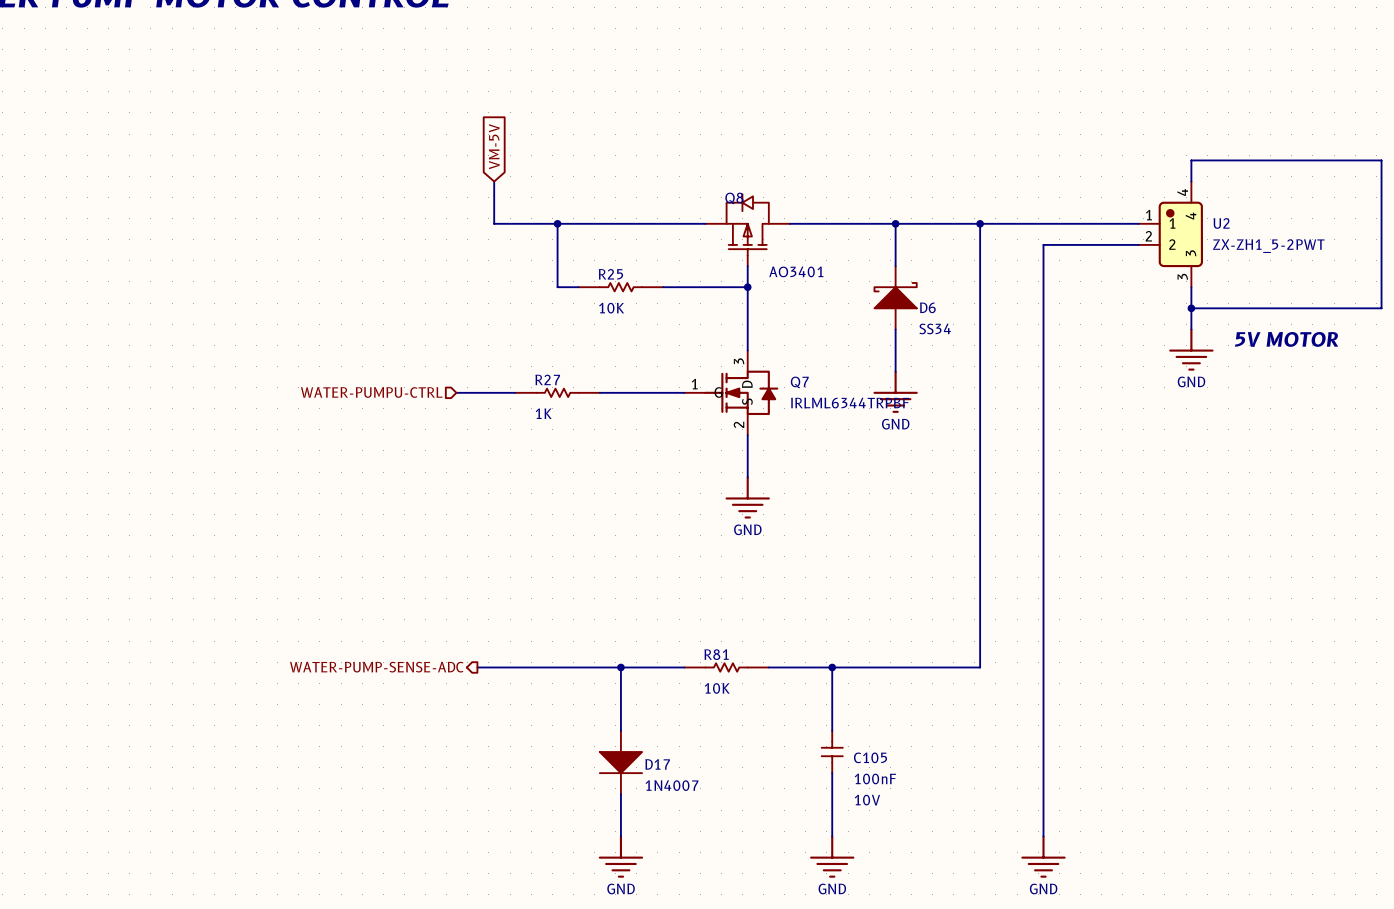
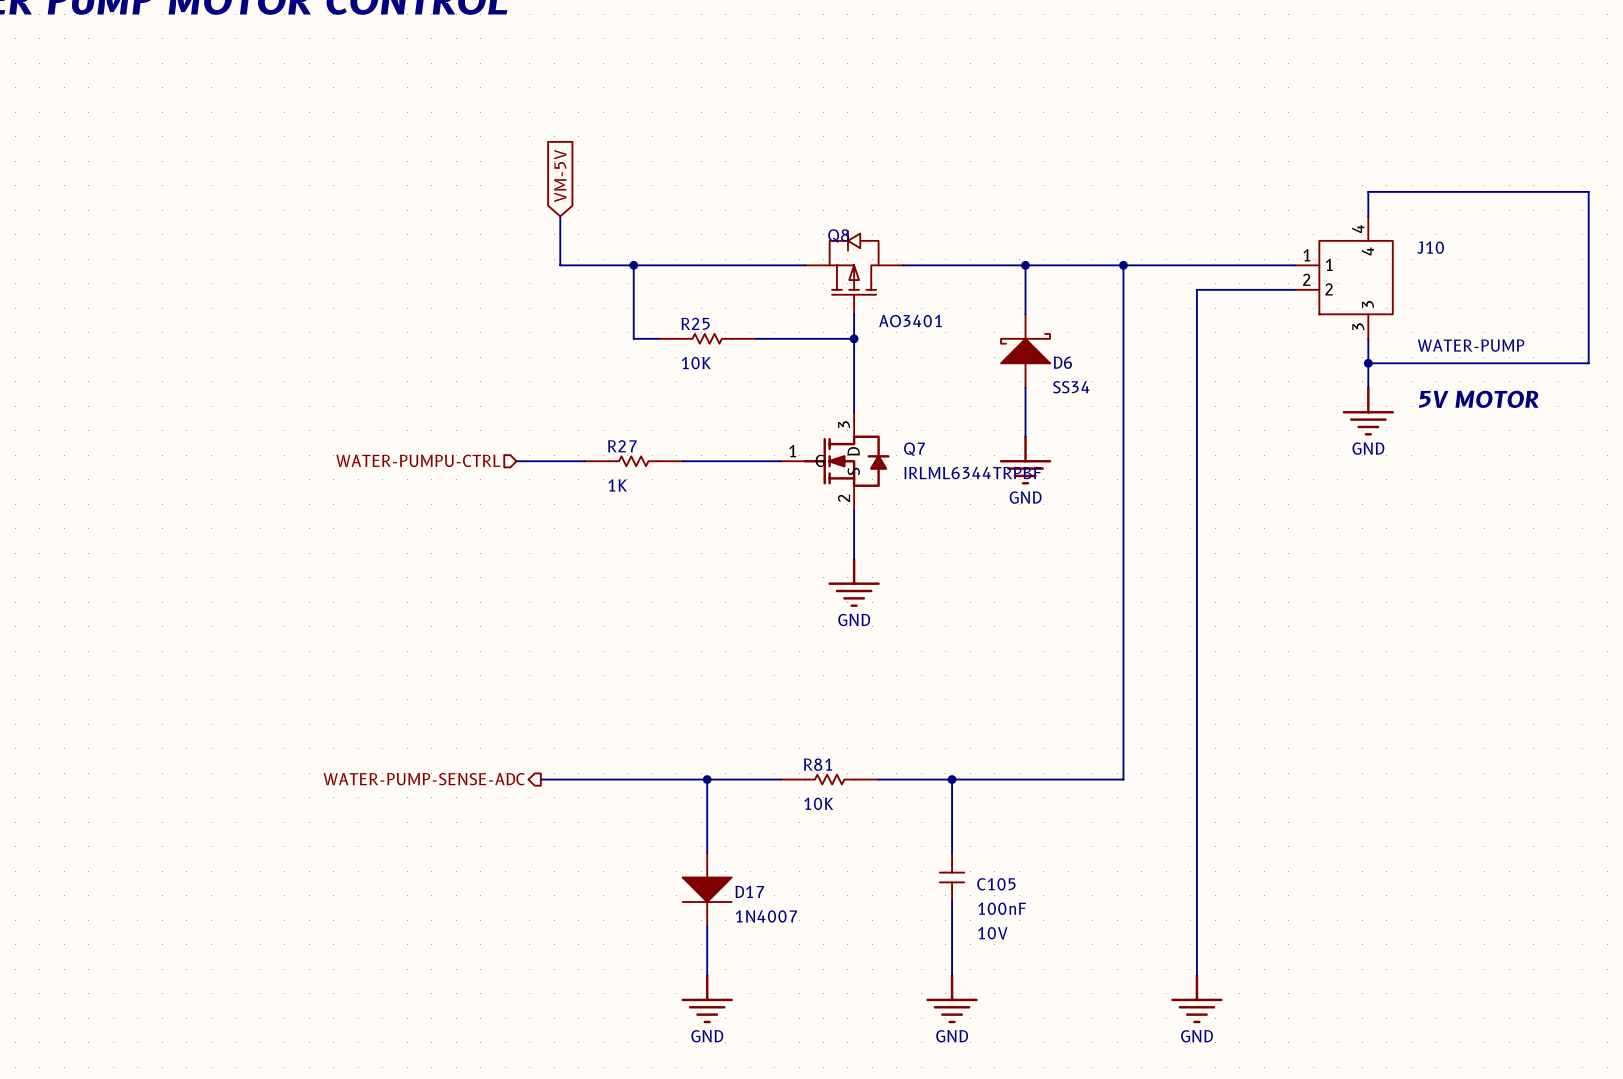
U2: ZX-ZH1_5-2PWT (1170, 234) -> none
J10: none -> WATER-PUMP (1343, 277)

